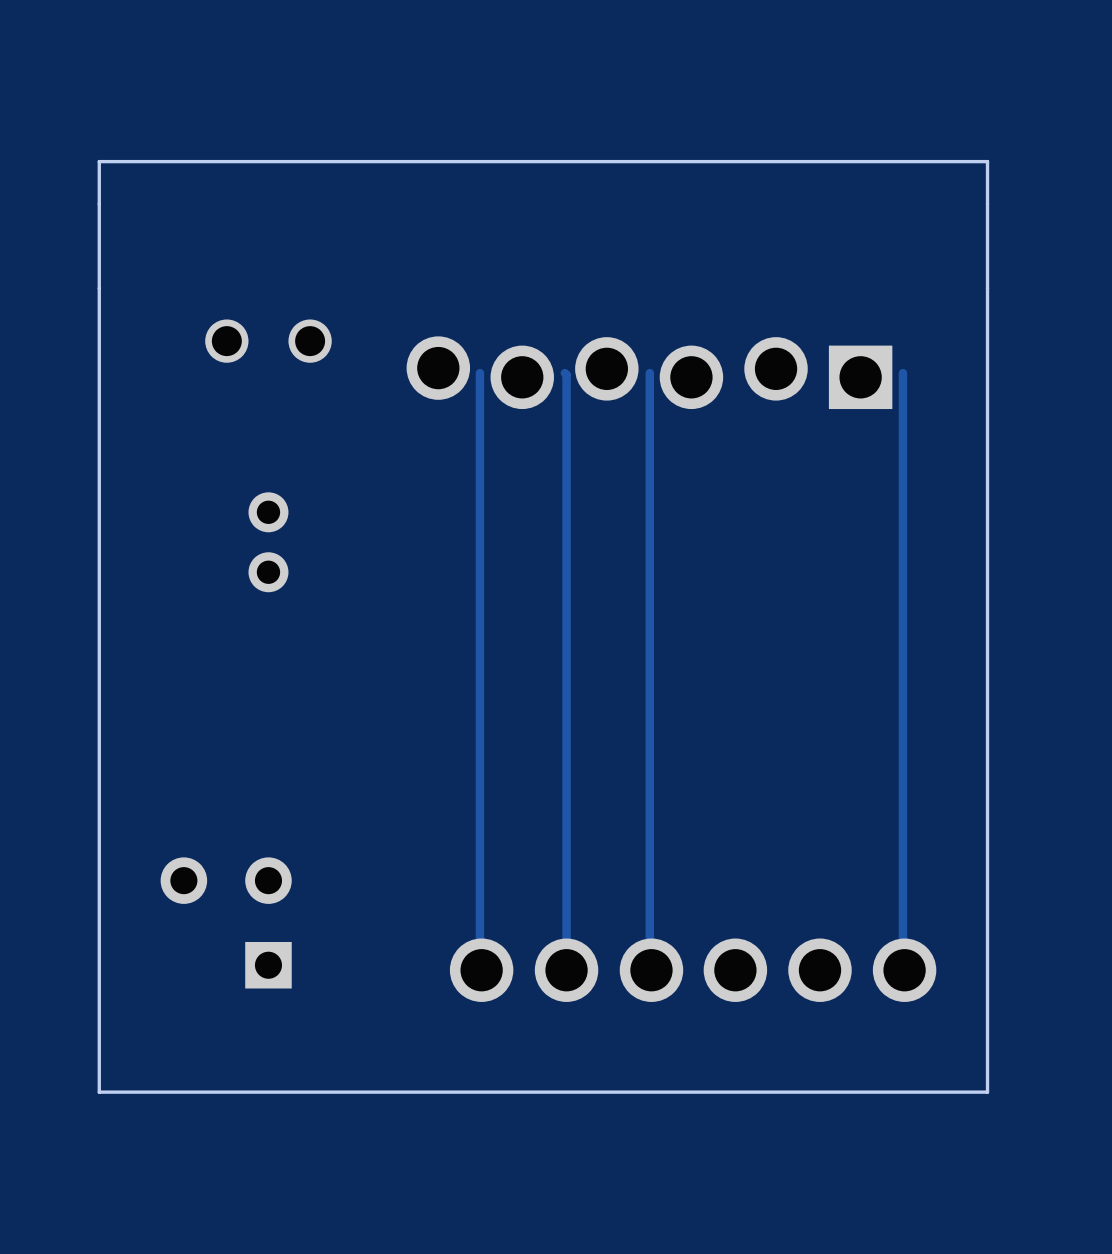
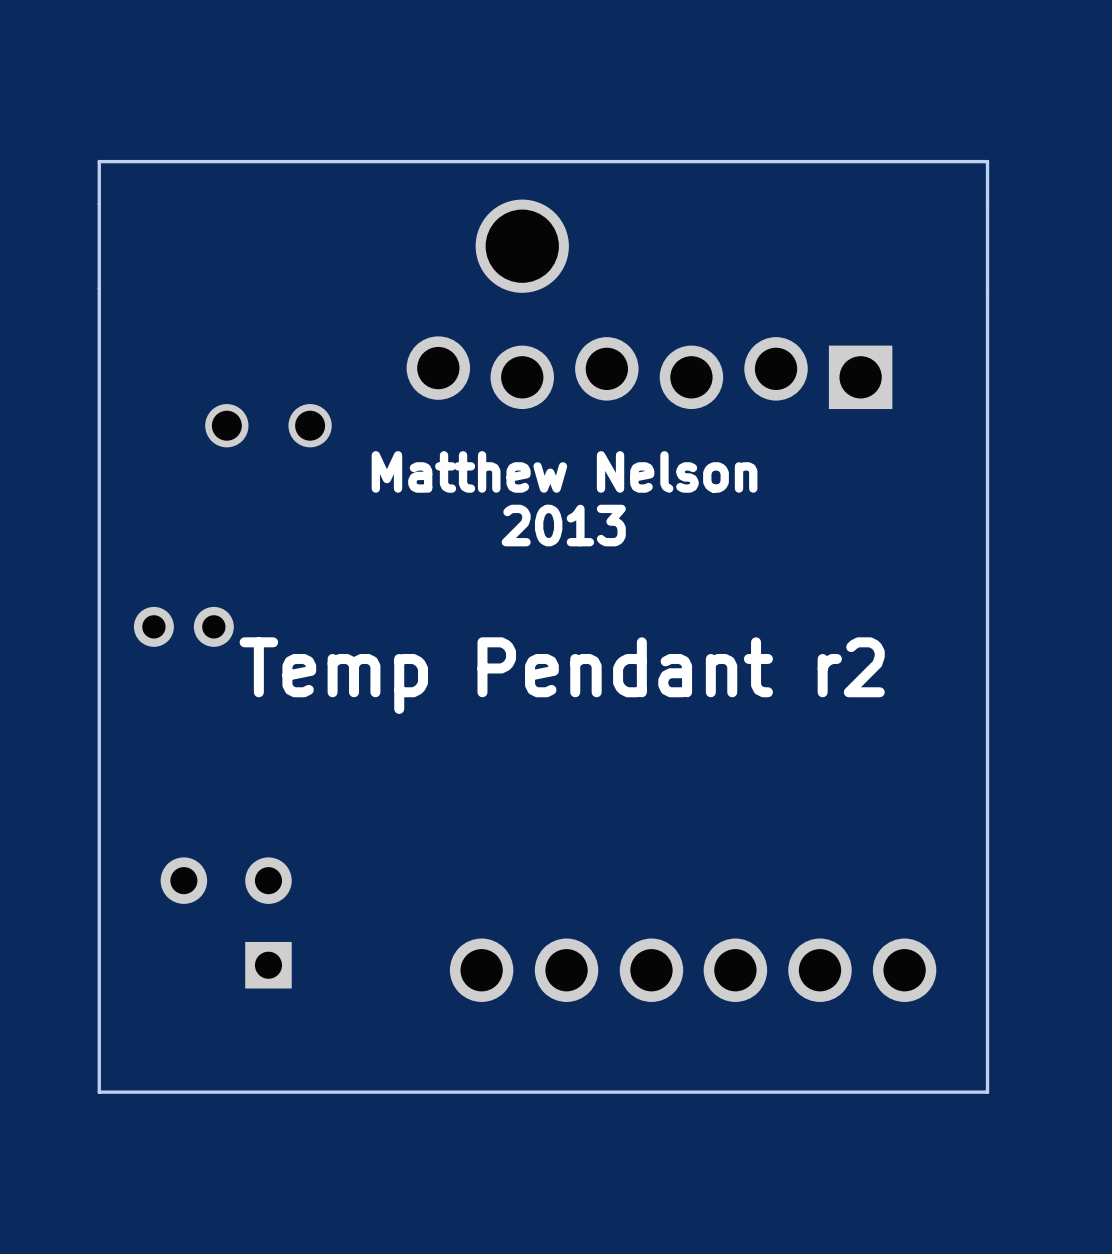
part: none -> (522, 246)
part position: (268, 341) -> (268, 425)
track: (479, 373) (479, 968) (481, 970) -> none
track: (564, 373) (566, 374) (566, 970) -> none
track: (649, 373) (649, 968) (651, 970) -> none
track: (902, 373) (902, 968) (904, 970) -> none
text: none -> Matthew Nelson (564, 471)
text: none -> 2013 (563, 525)
part rotation: 0° (268, 542) -> 90° clockwise (183, 626)
part position: (268, 542) -> (183, 626)
text: none -> Temp Pendant r2 (562, 675)

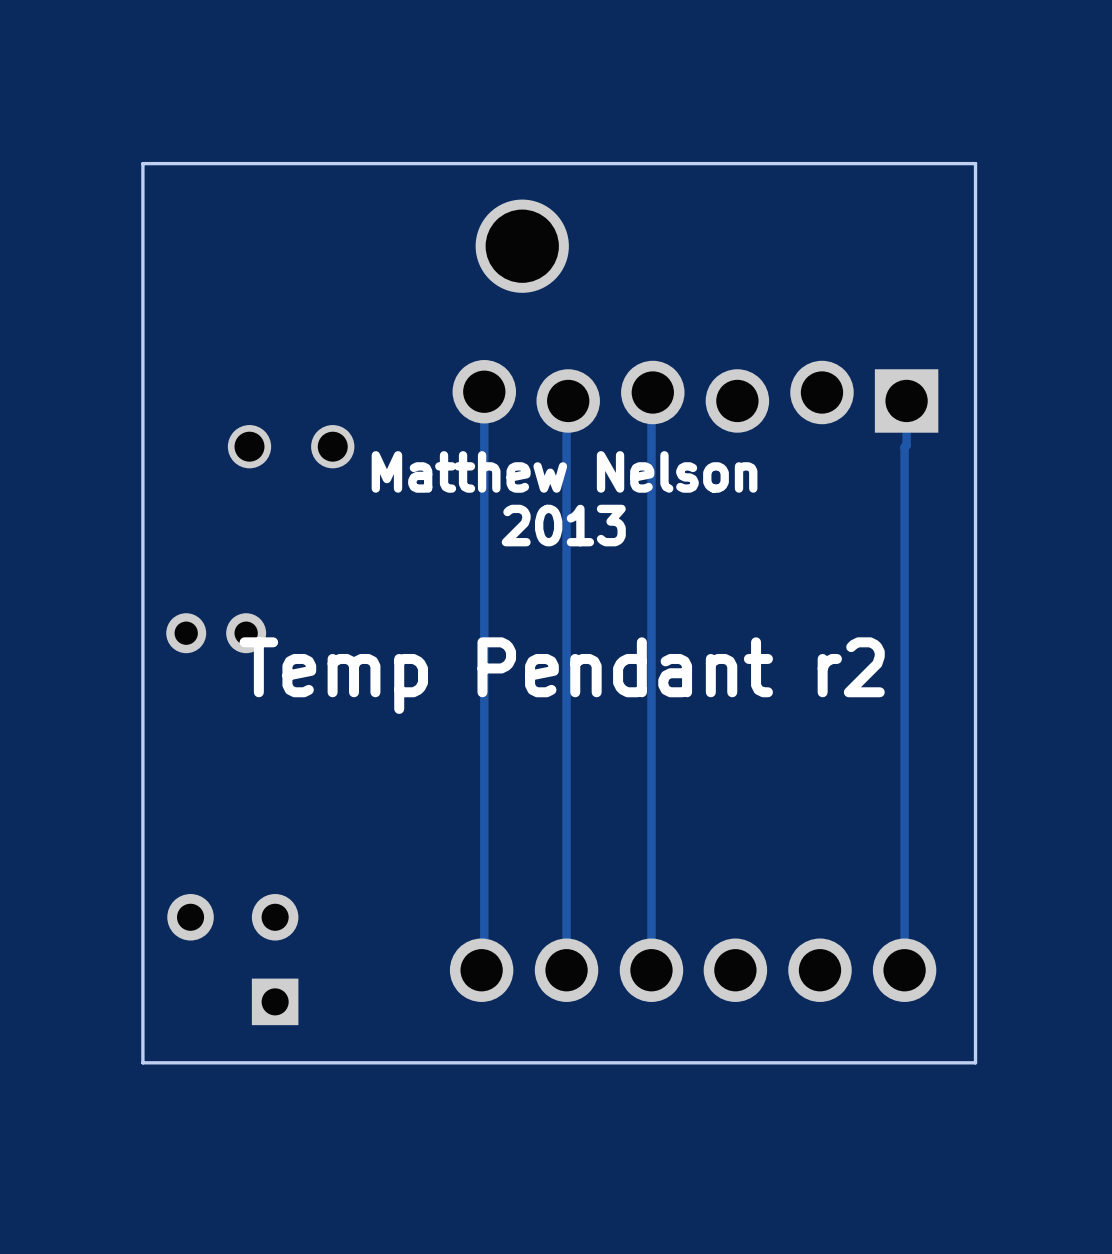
board edge: (987, 161) (987, 1092) (99, 1092) (99, 161) (987, 161) -> (975, 163) (975, 1062) (142, 1062) (142, 163) (975, 163)
part position: (649, 372) -> (695, 396)
track: none -> (484, 391) (484, 967) (481, 970)
track: none -> (652, 392) (651, 970)
track: none -> (568, 400) (566, 402) (566, 970)
track: none -> (906, 400) (906, 445) (904, 447) (904, 970)
part position: (268, 425) -> (291, 446)
part position: (183, 626) -> (216, 633)
part position: (226, 922) -> (232, 959)

